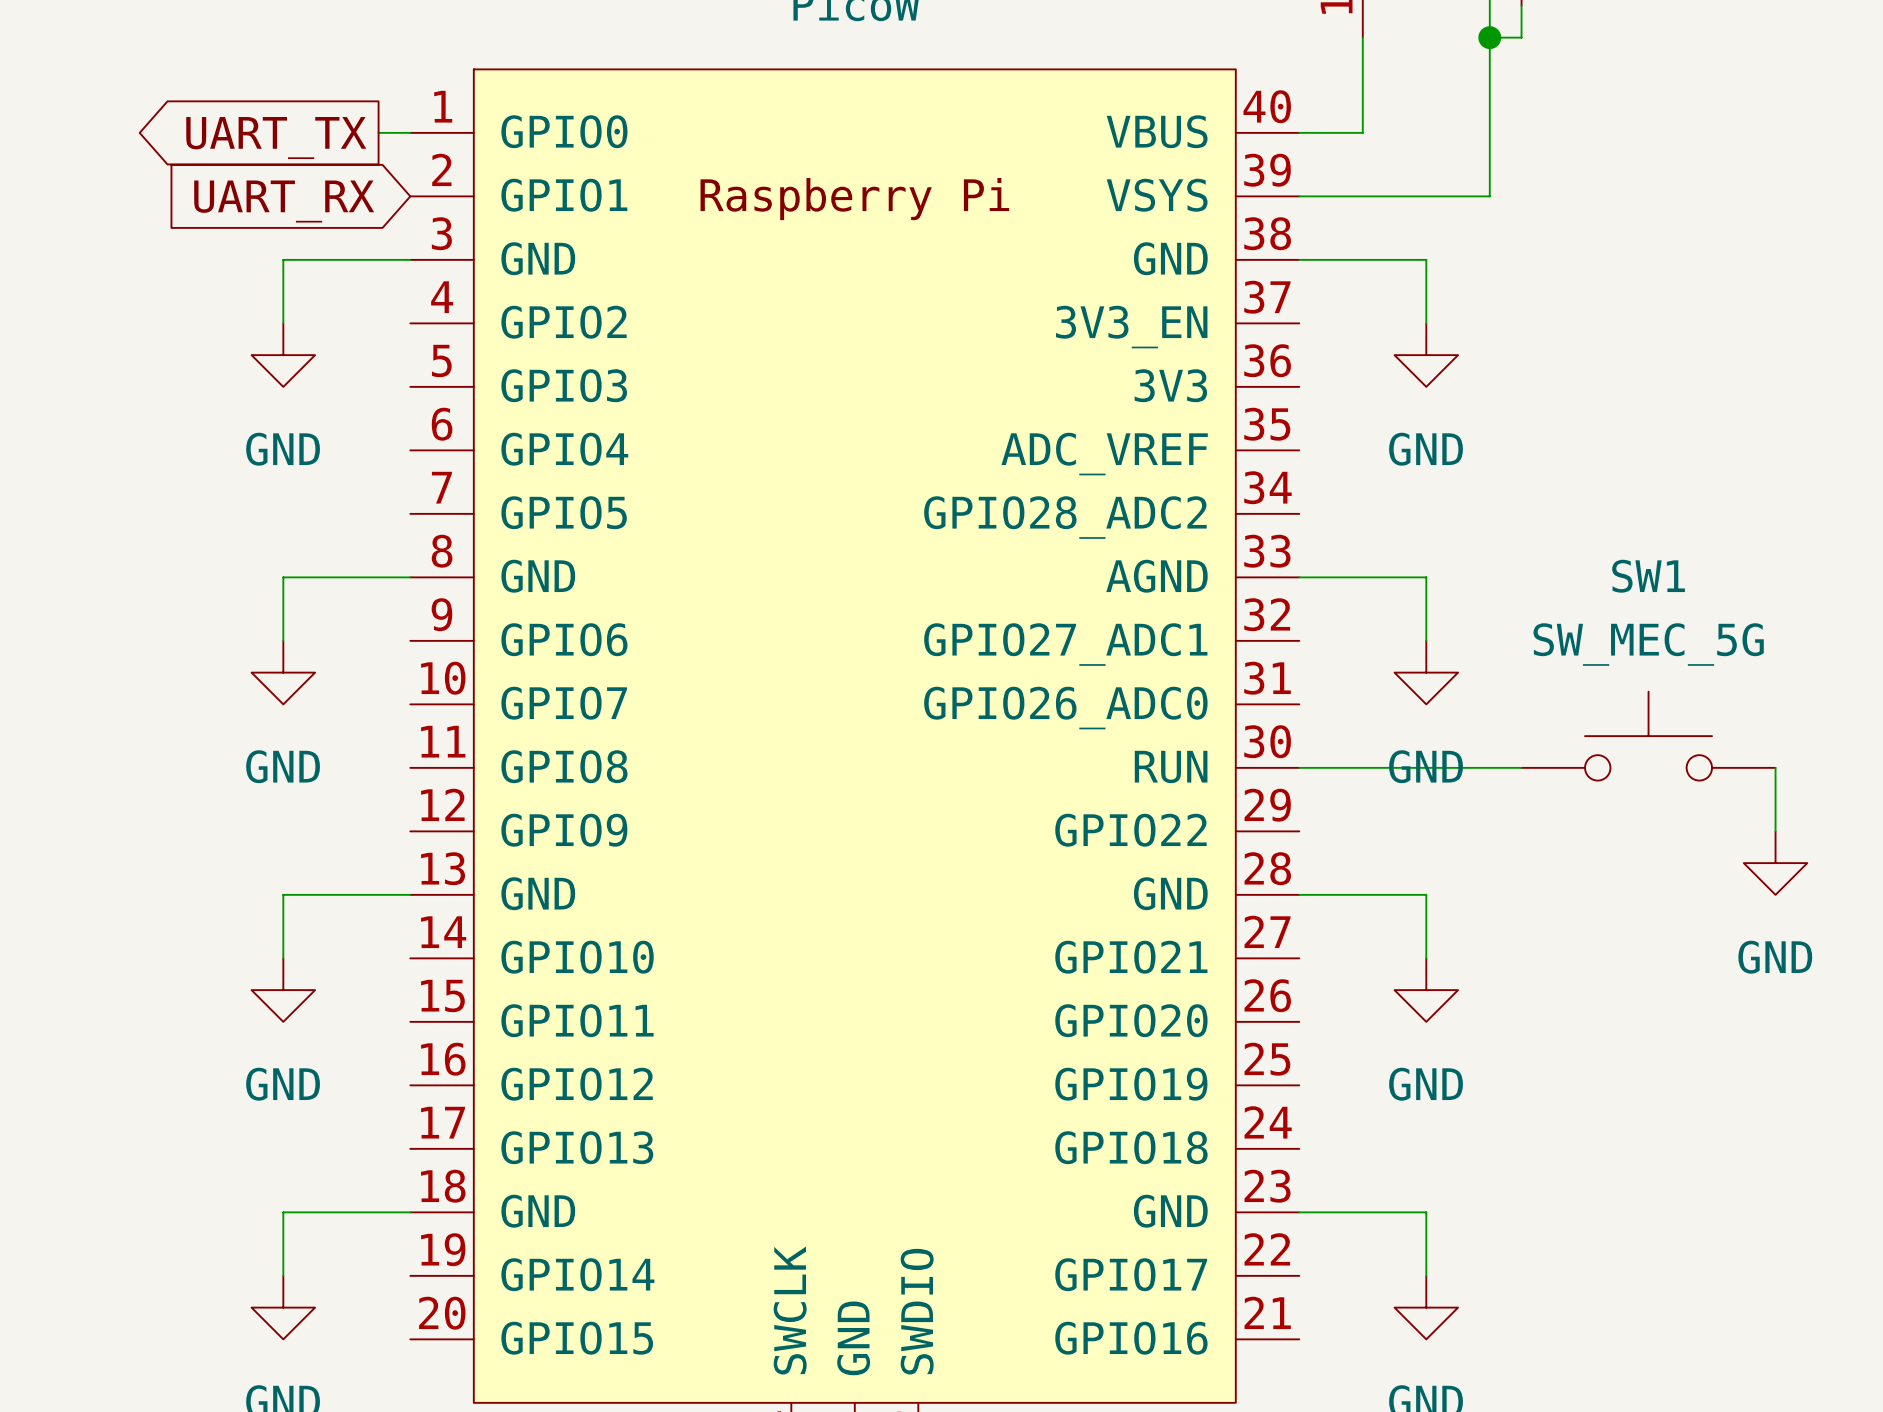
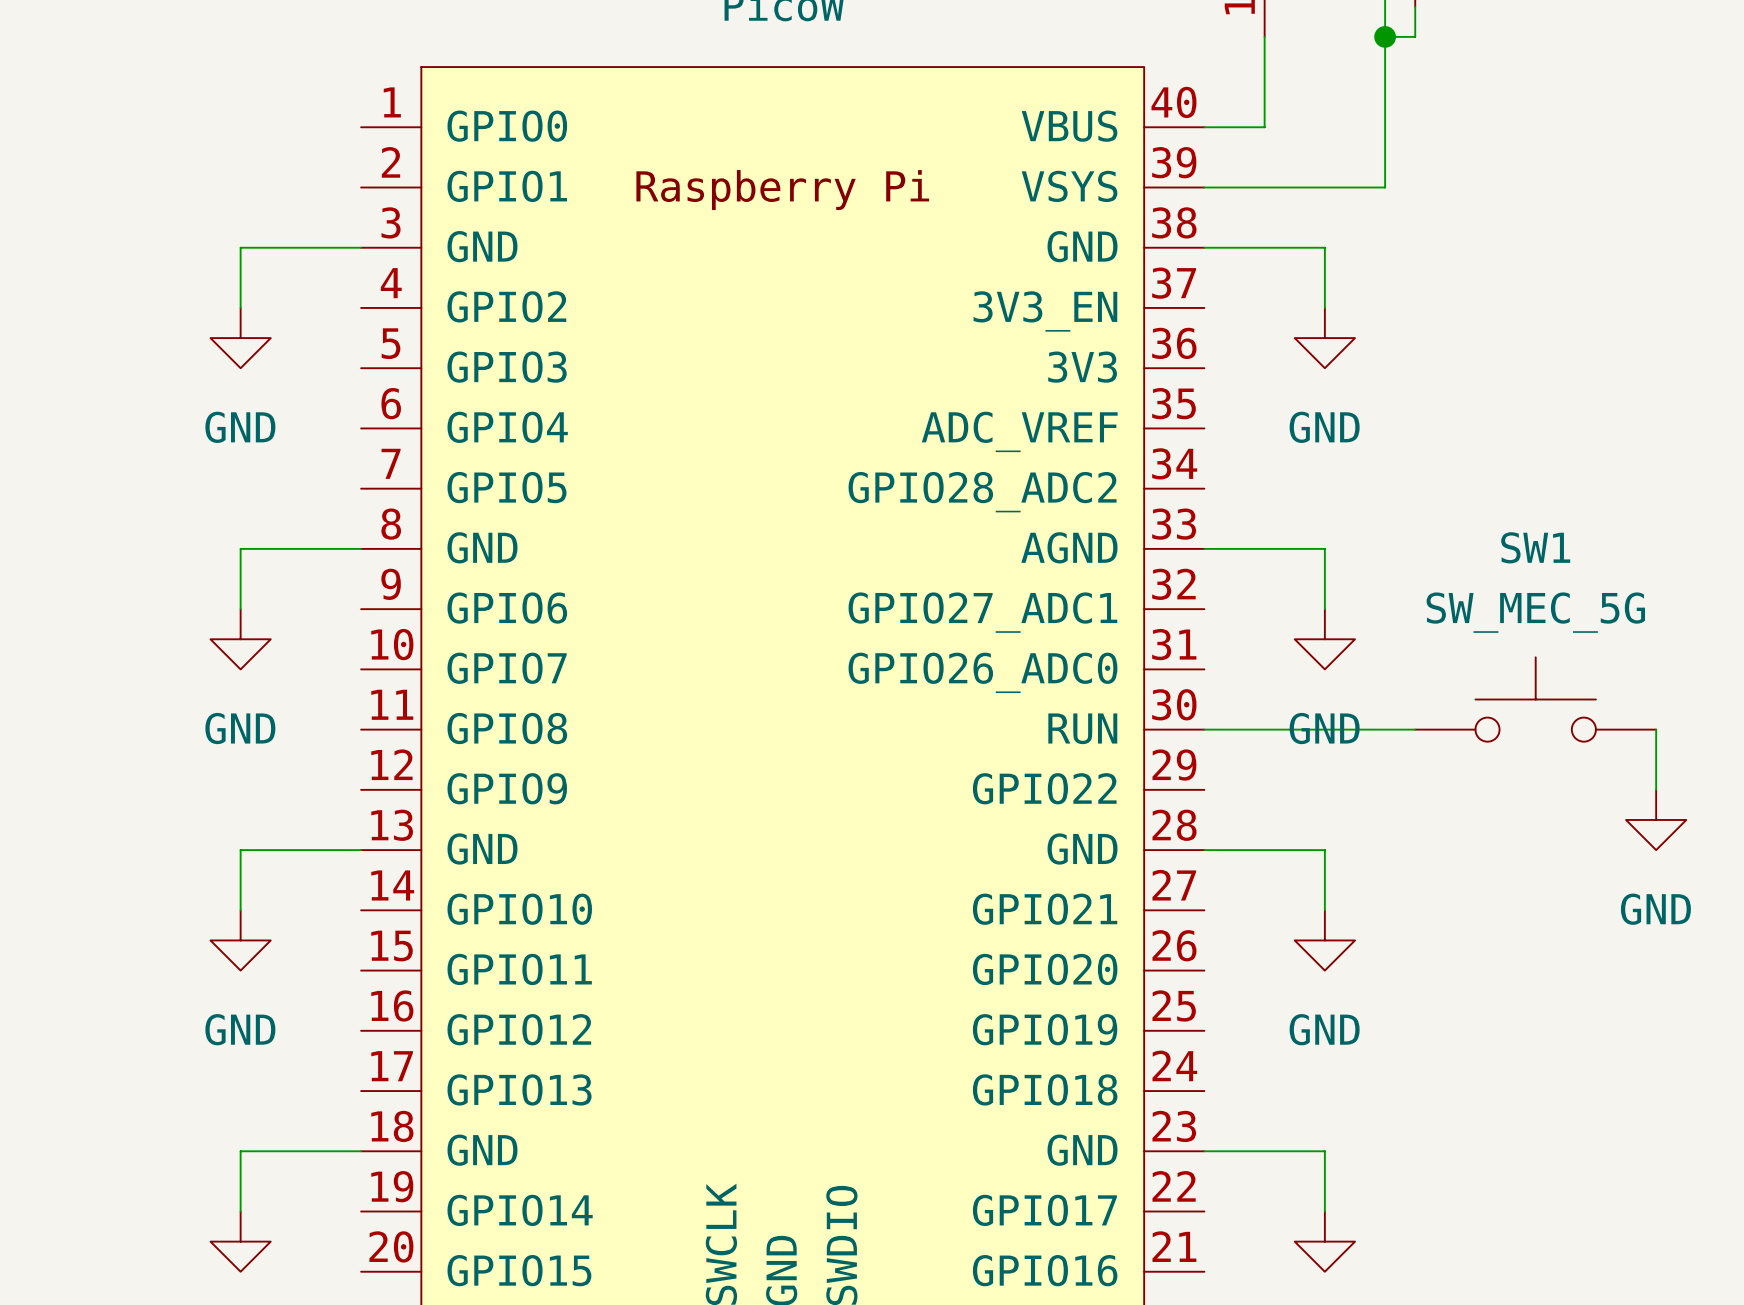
wire: (378, 132) (410, 132) -> none
global label: UART_TX (276, 138) -> none
global label: UART_RX (284, 201) -> none

